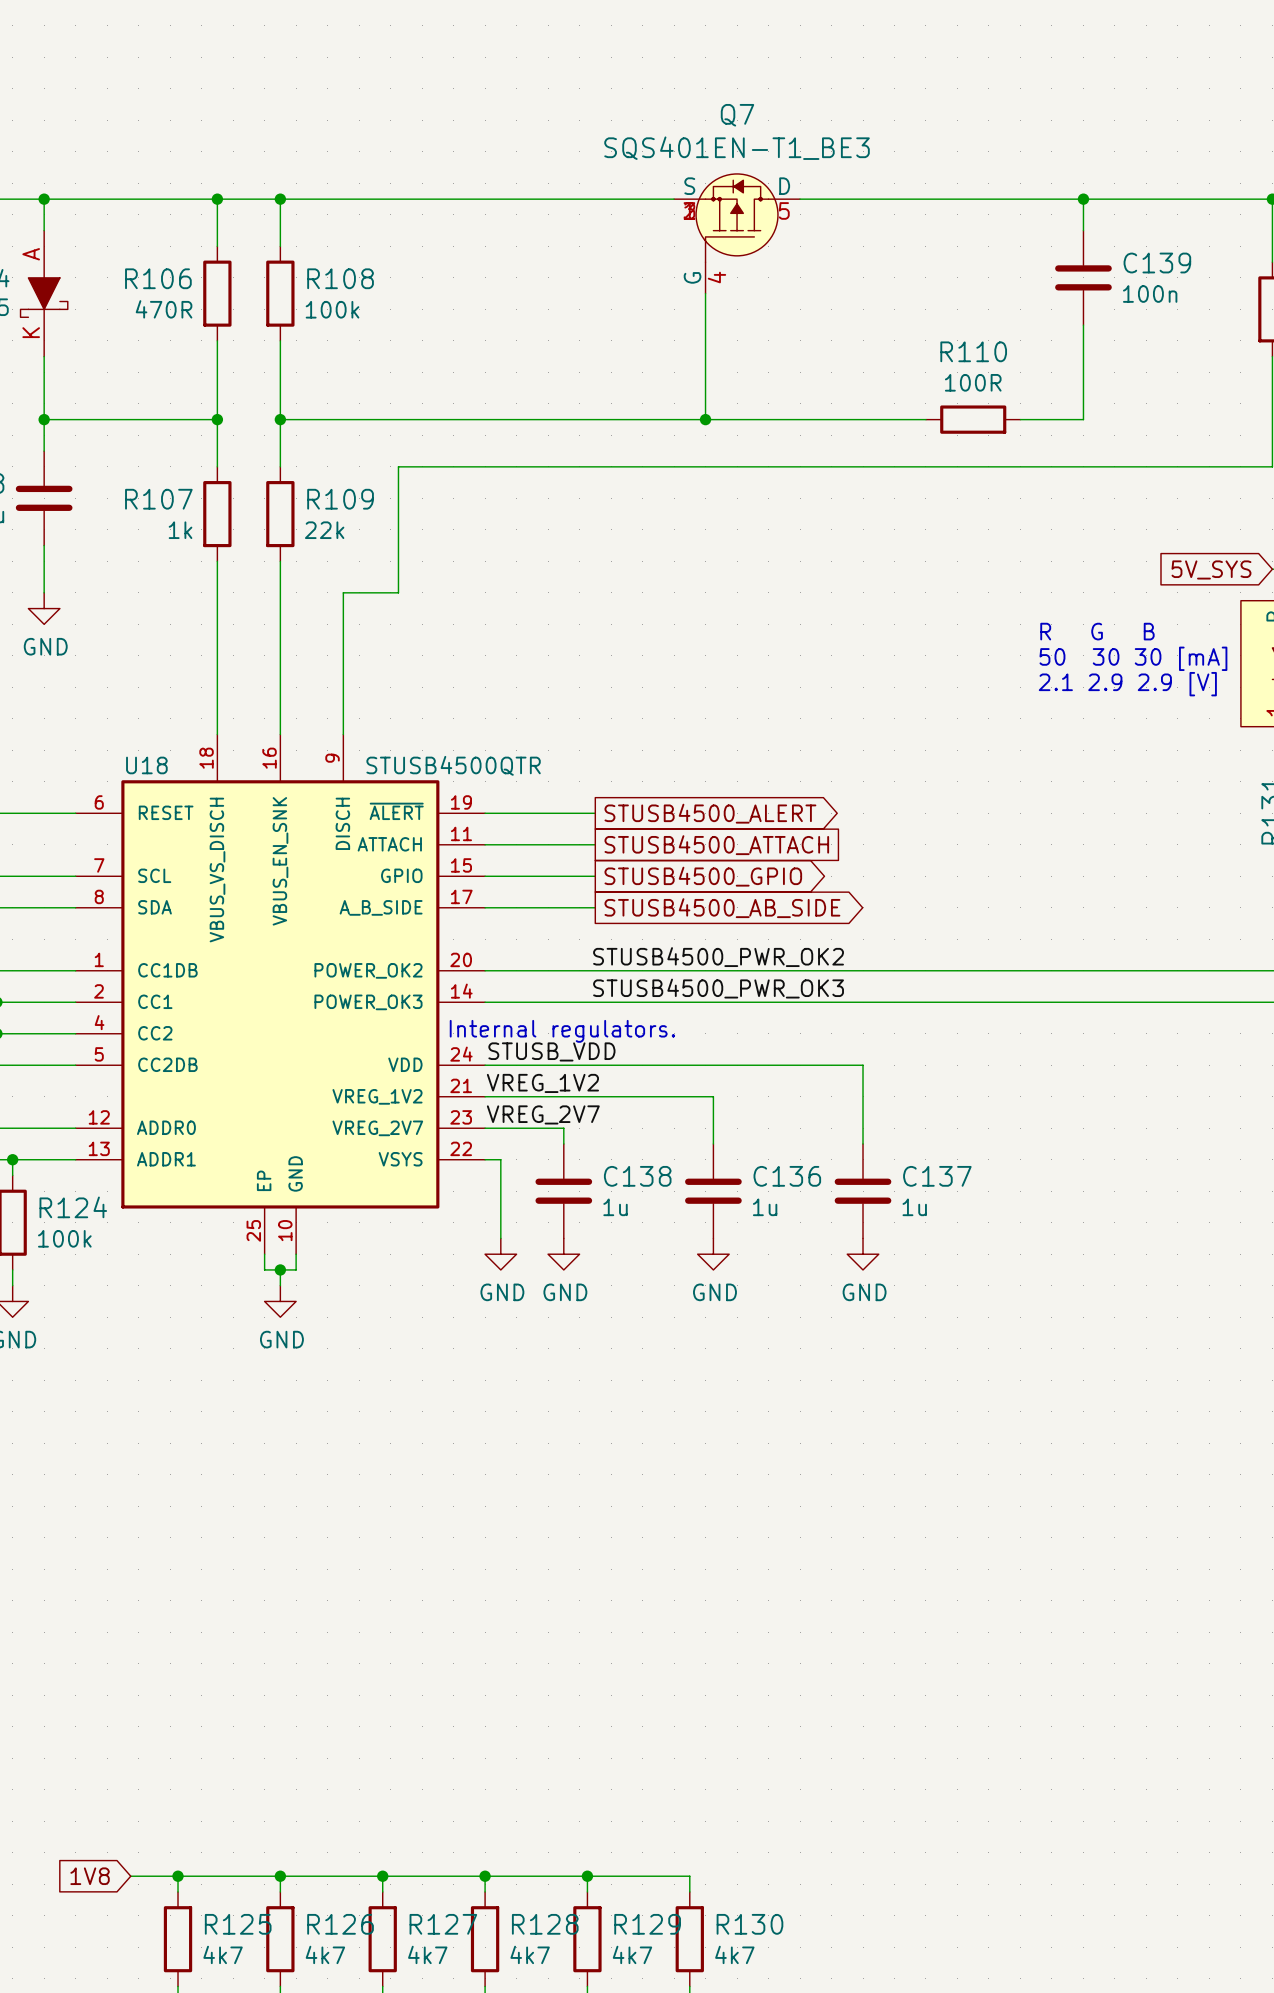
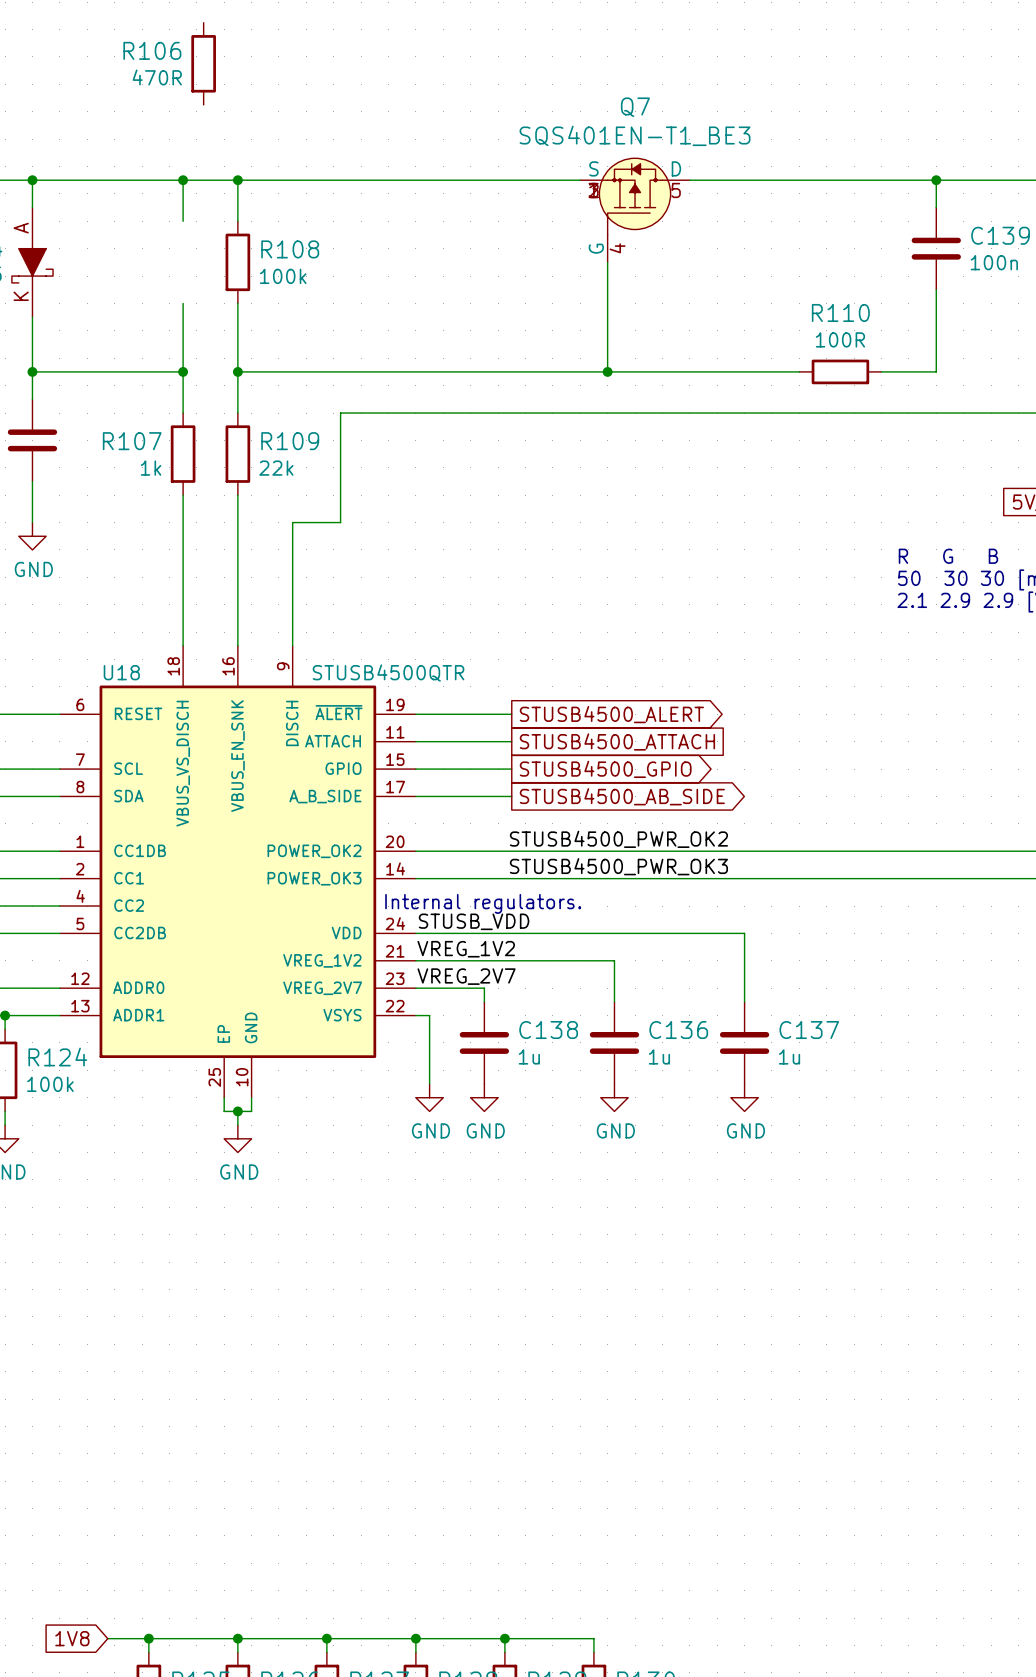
R106 position: (217, 293) -> (203, 63)

